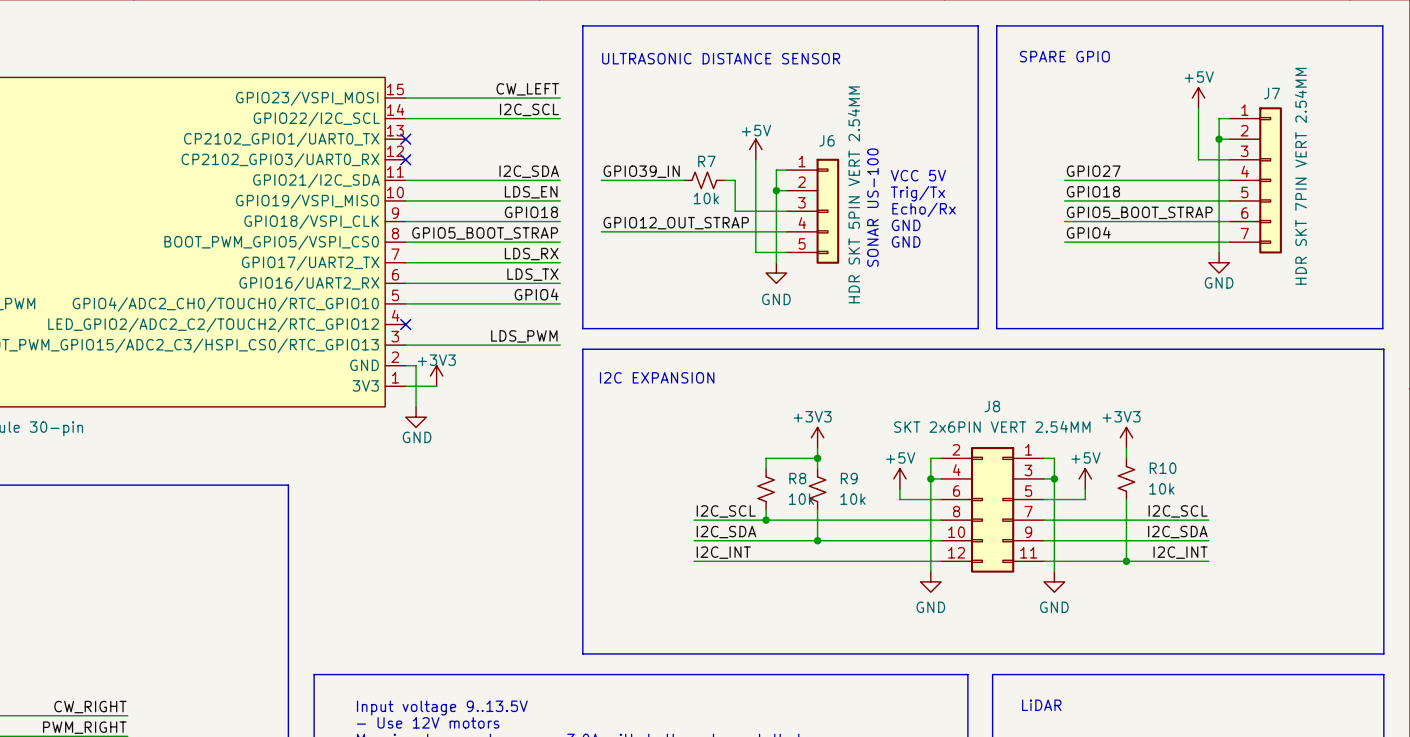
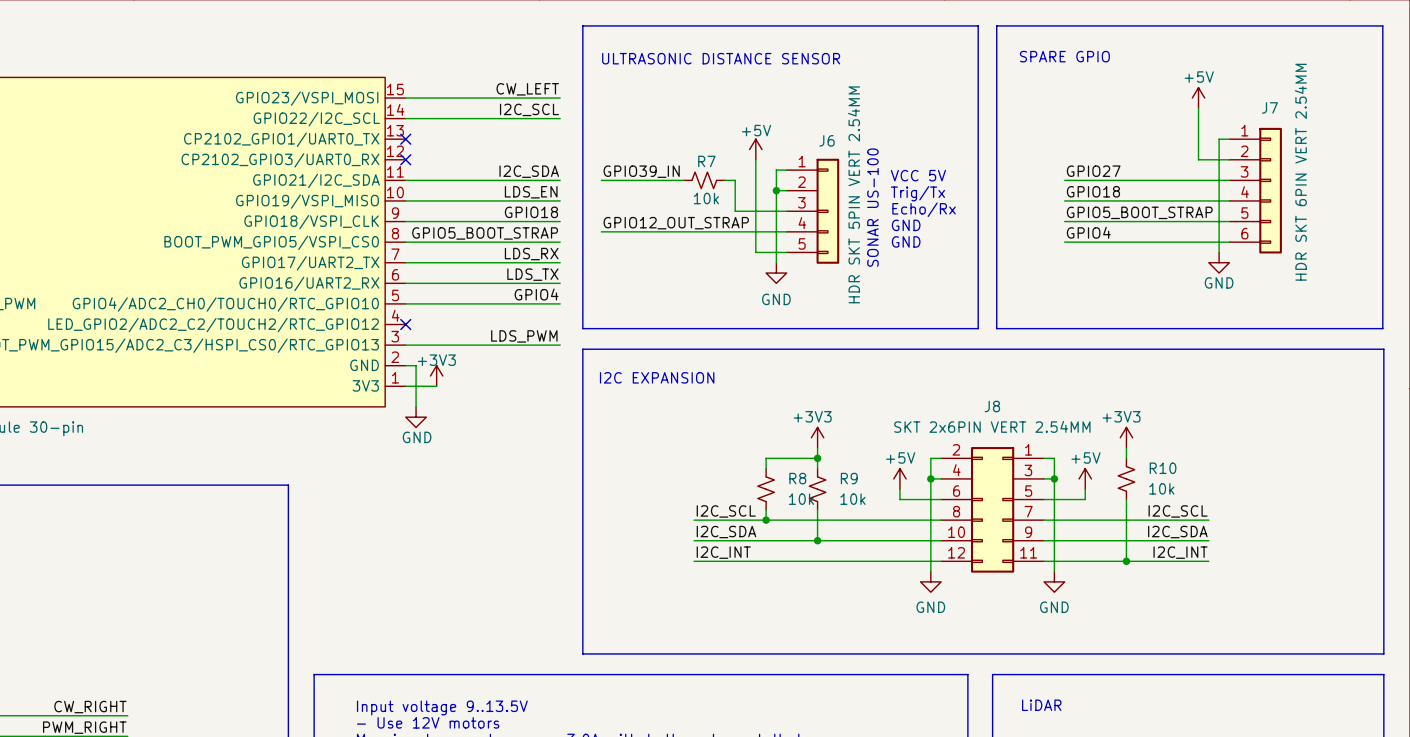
J7 symbol: [1229, 107, 1282, 254] -> [1229, 127, 1282, 254]
wire: (1229, 118) (1219, 118) (1219, 139) -> none
junction: (1219, 139) -> none
J7 value: HDR SKT 7PIN VERT 2.54MM (1300, 176) -> HDR SKT 6PIN VERT 2.54MM (1300, 172)

